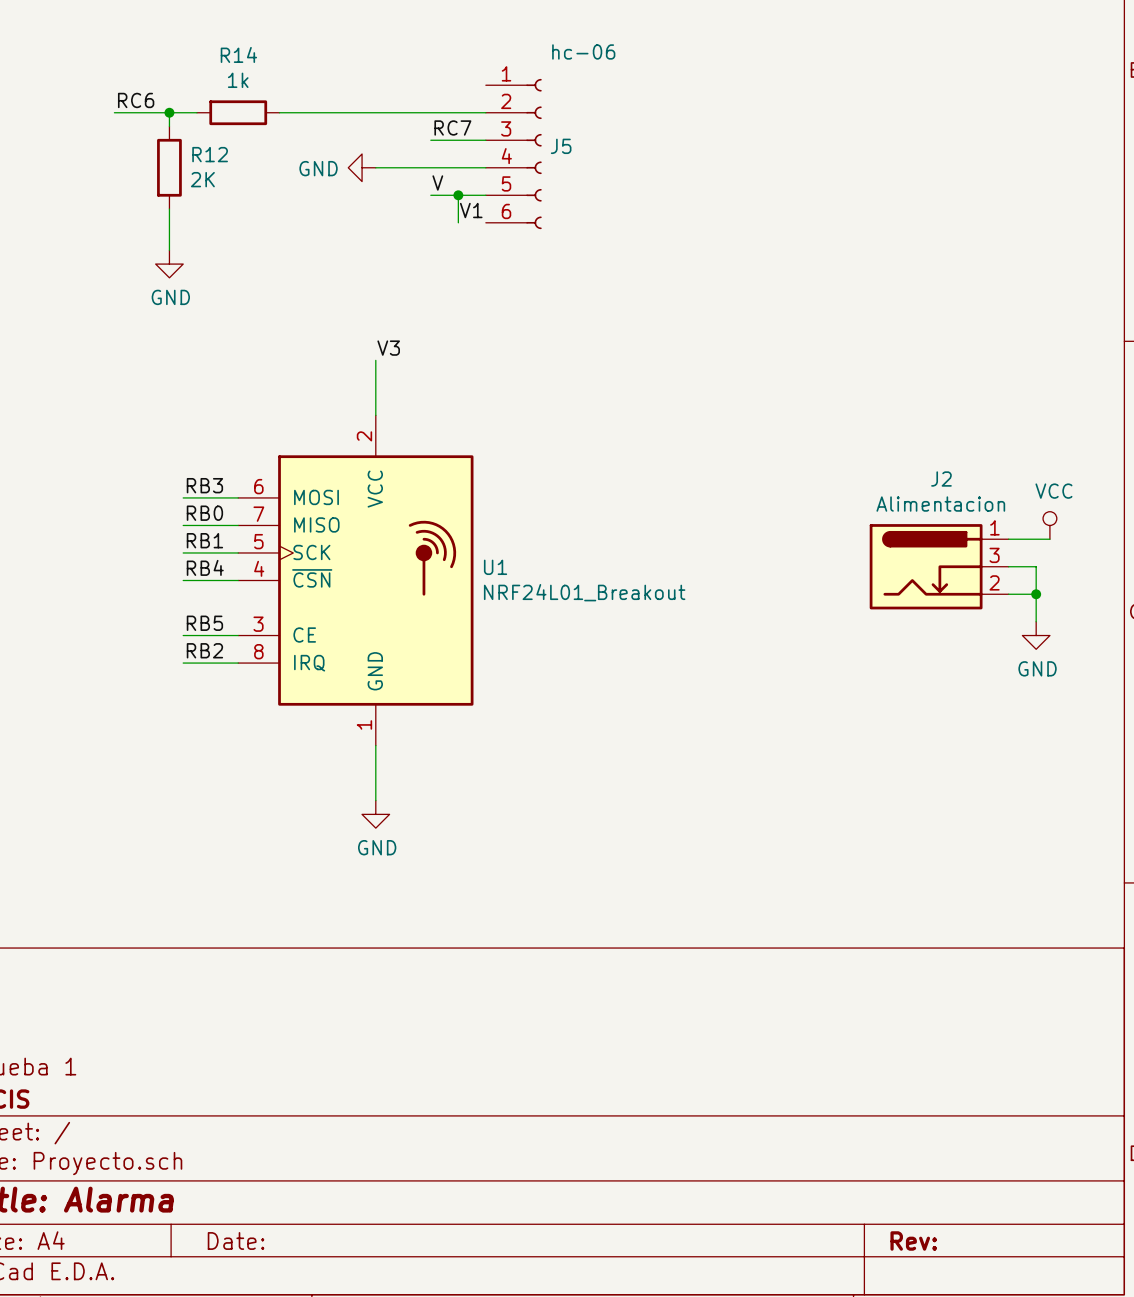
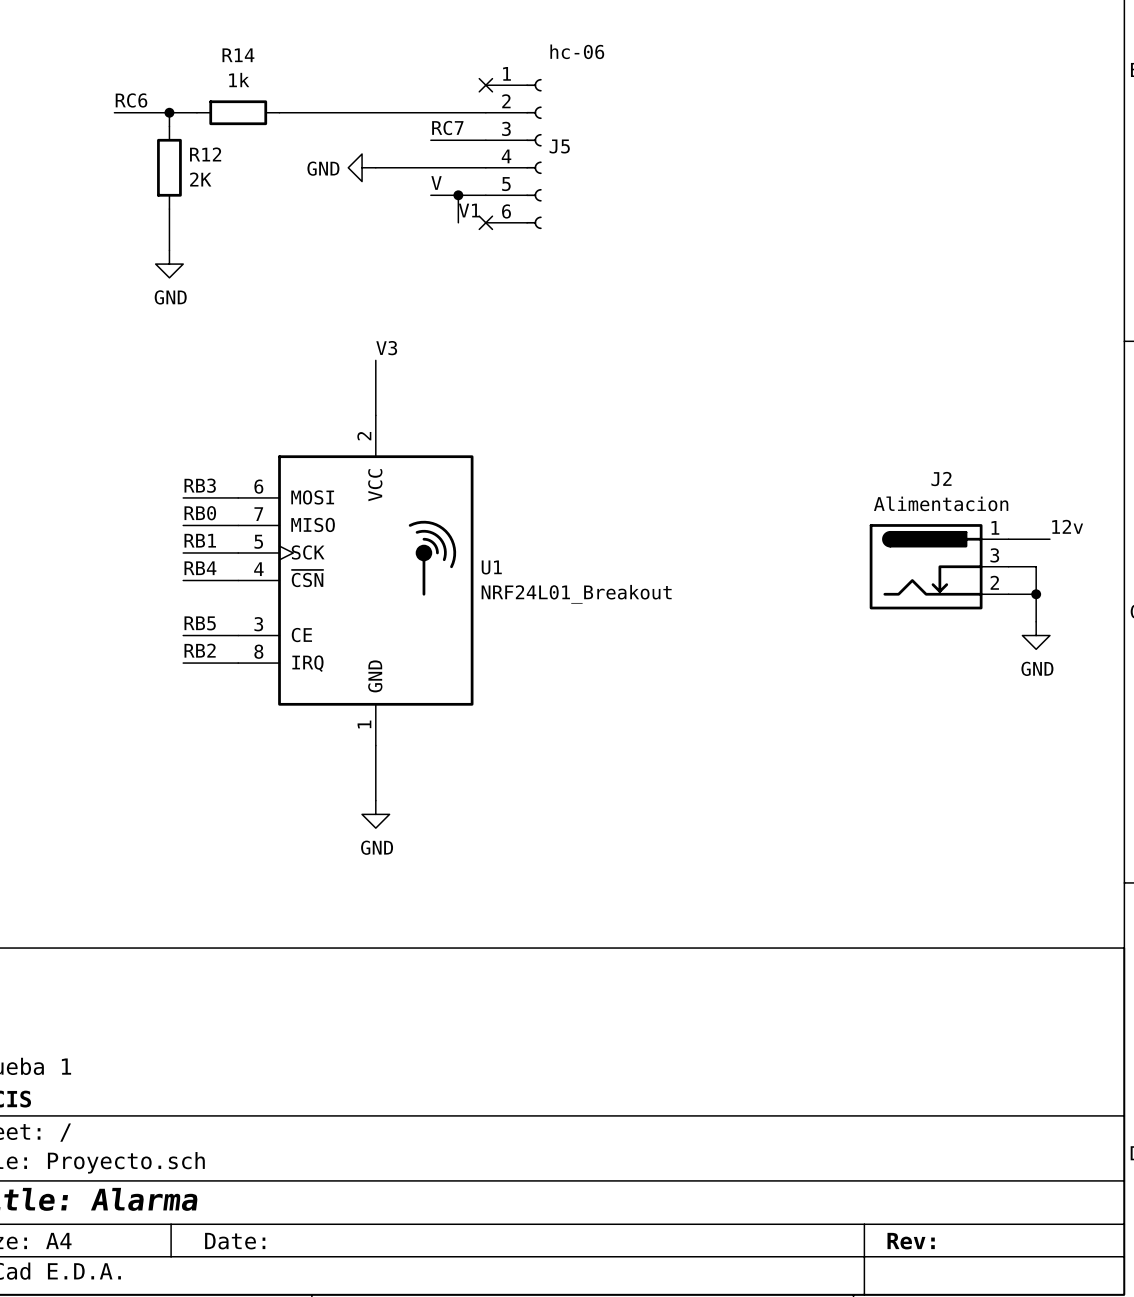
no-connect mark: none -> (485, 85)
no-connect mark: none -> (485, 222)
power symbol: VCC (1049, 525) -> none
label: none -> 12v (1067, 526)

